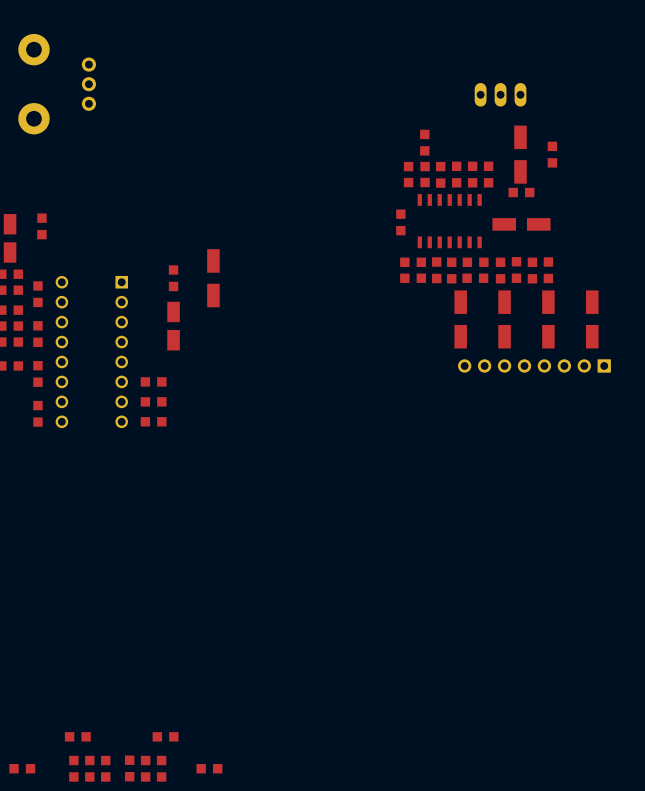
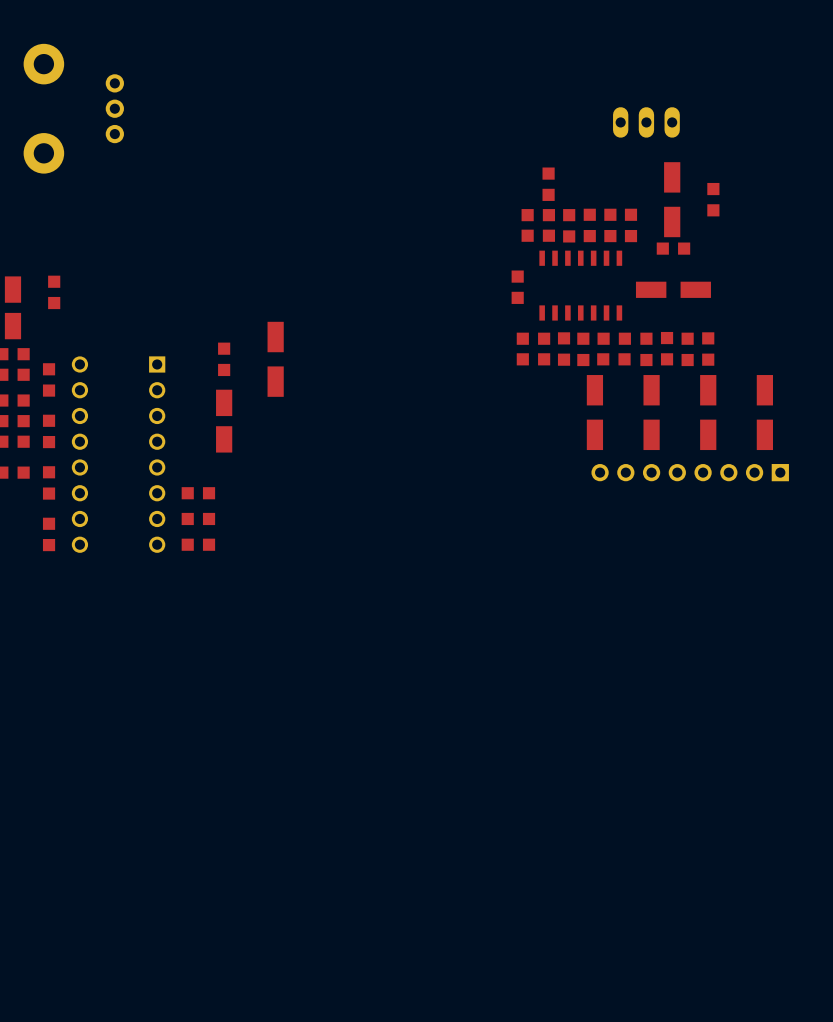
part: (77, 736) -> none
part: (165, 736) -> none
part: (22, 768) -> none
part: (73, 768) -> none
part: (89, 768) -> none
part: (105, 768) -> none
part: (129, 768) -> none
part: (145, 768) -> none
part: (161, 768) -> none
part: (209, 768) -> none

